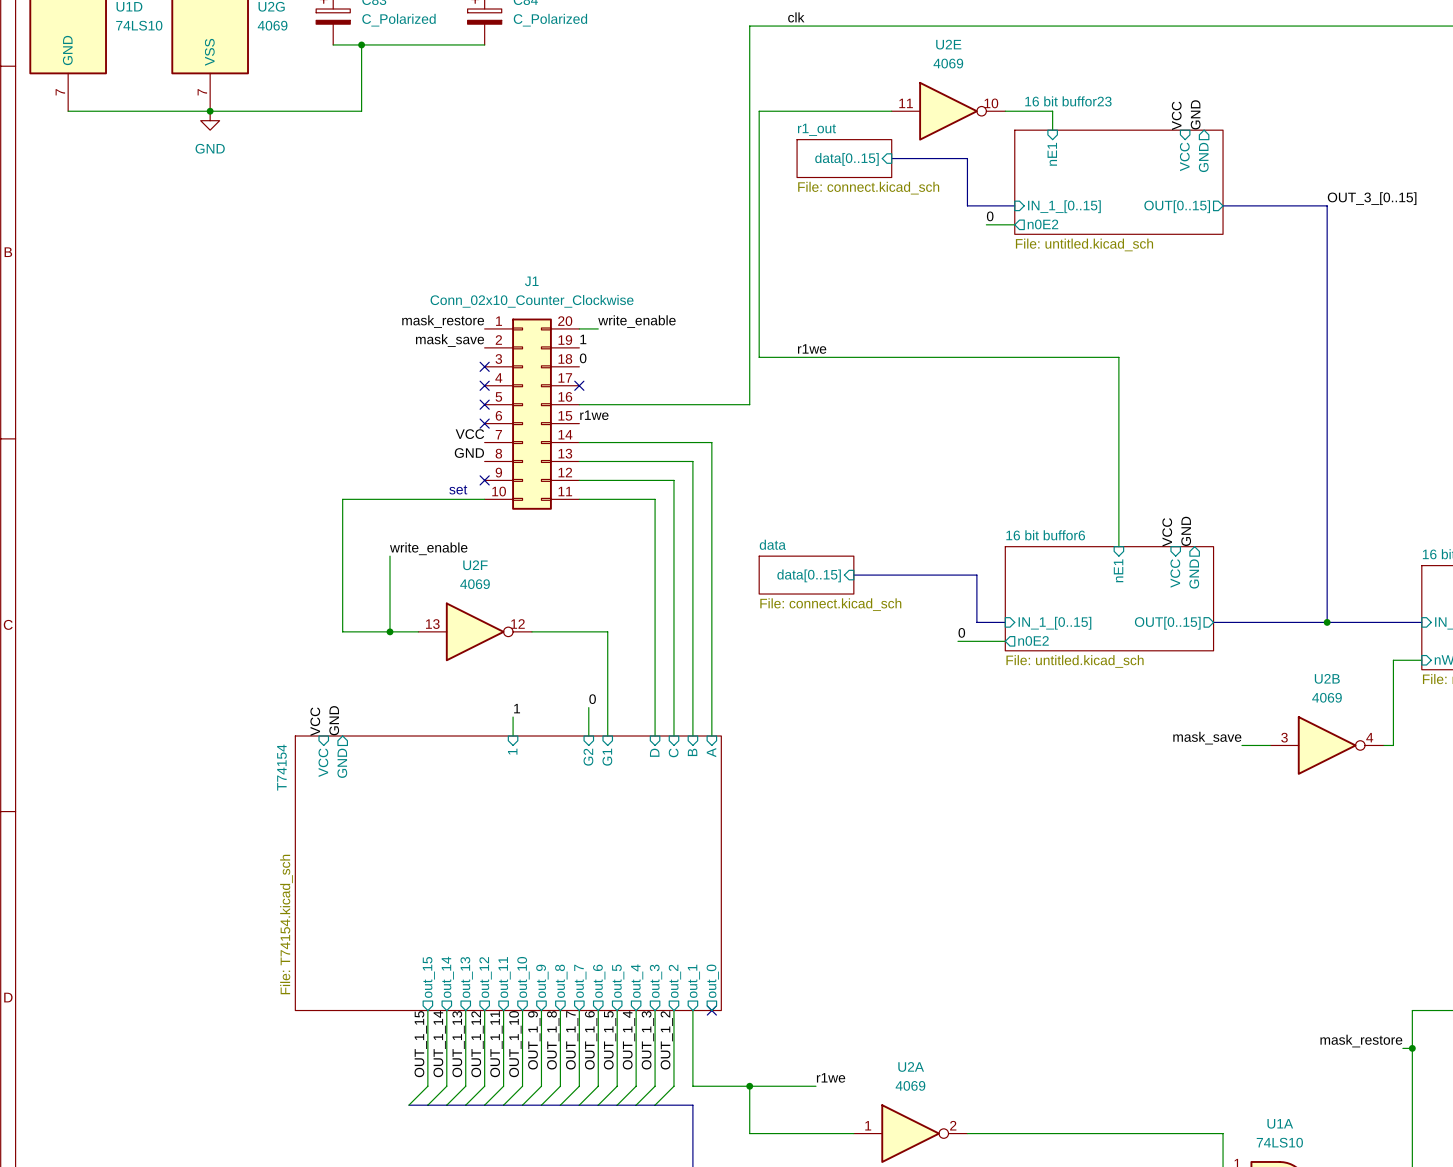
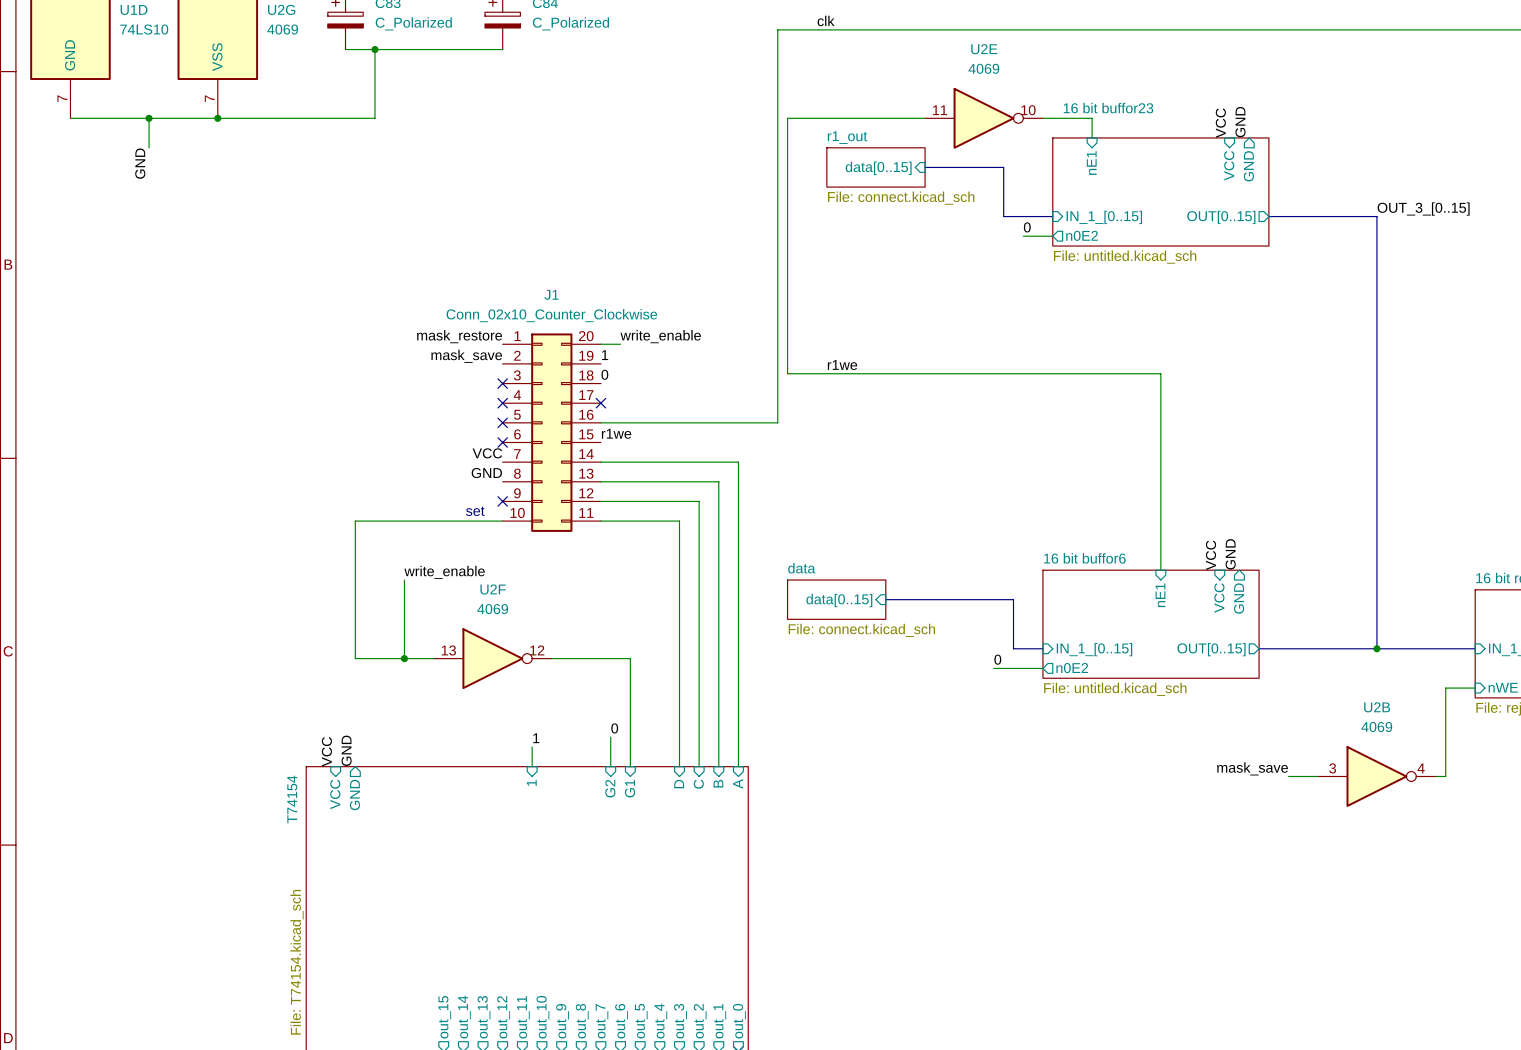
wire: none -> (149, 118) (149, 147)
junction: none -> (149, 118)
power symbol: GND (210, 120) -> none
label: none -> GND (140, 163)

